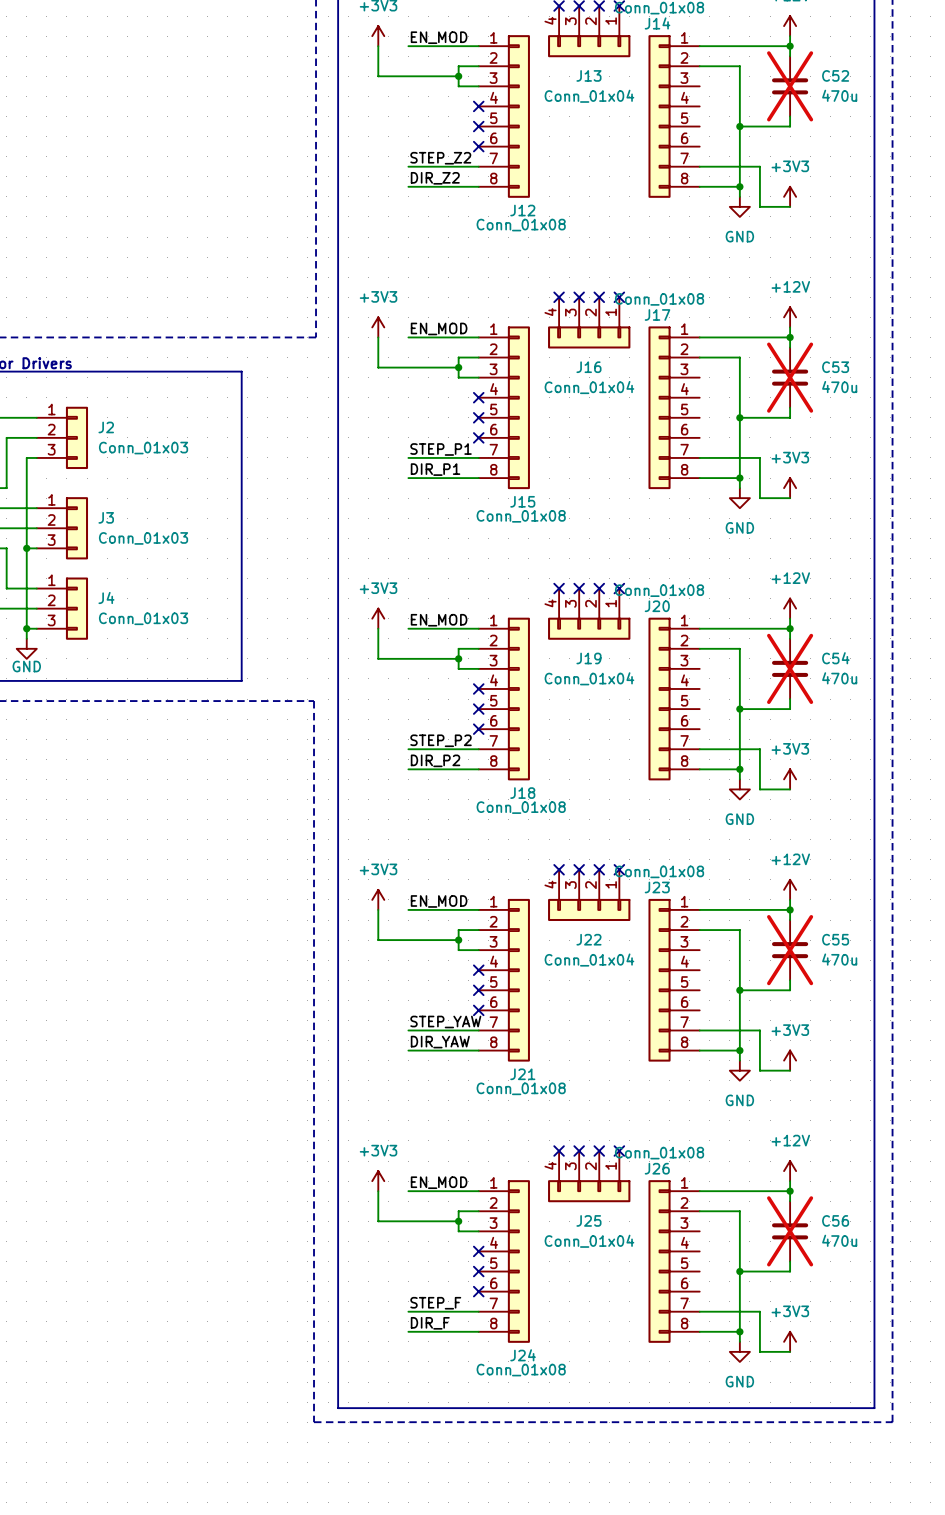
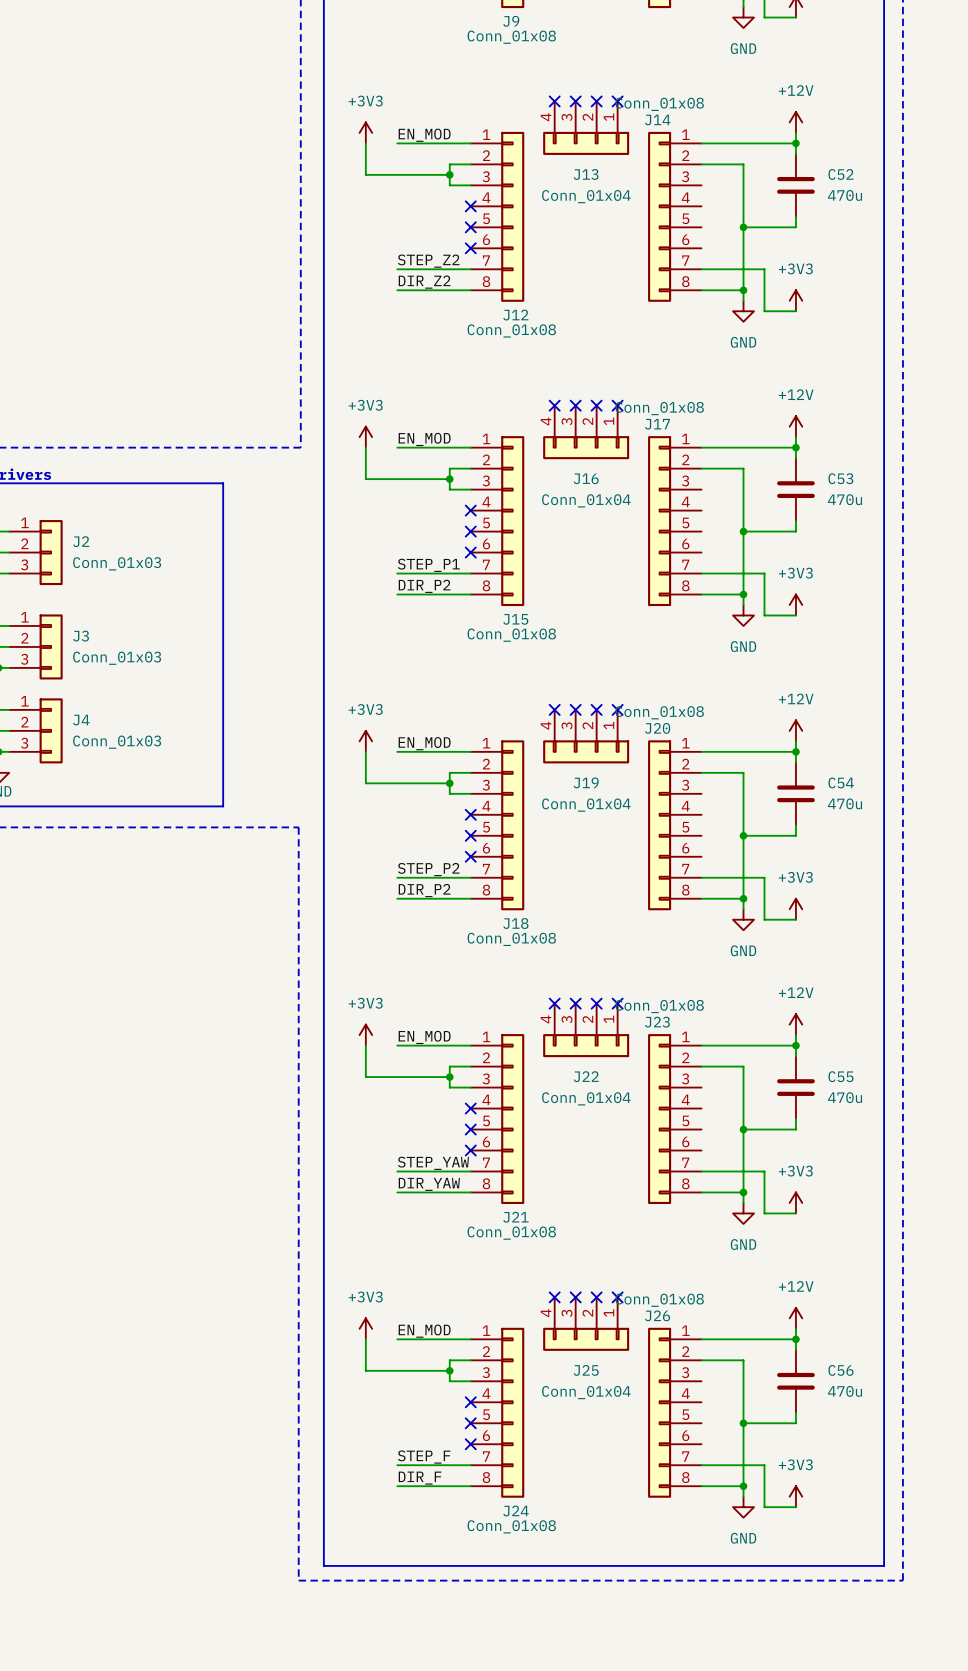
C52 do-not-place cross: (790, 86) -> none
C53 do-not-place cross: (790, 377) -> none
label: DIR_P1 (435, 469) -> DIR_P2 (424, 586)
C54 do-not-place cross: (790, 668) -> none
C55 do-not-place cross: (790, 950) -> none
C56 do-not-place cross: (790, 1231) -> none

